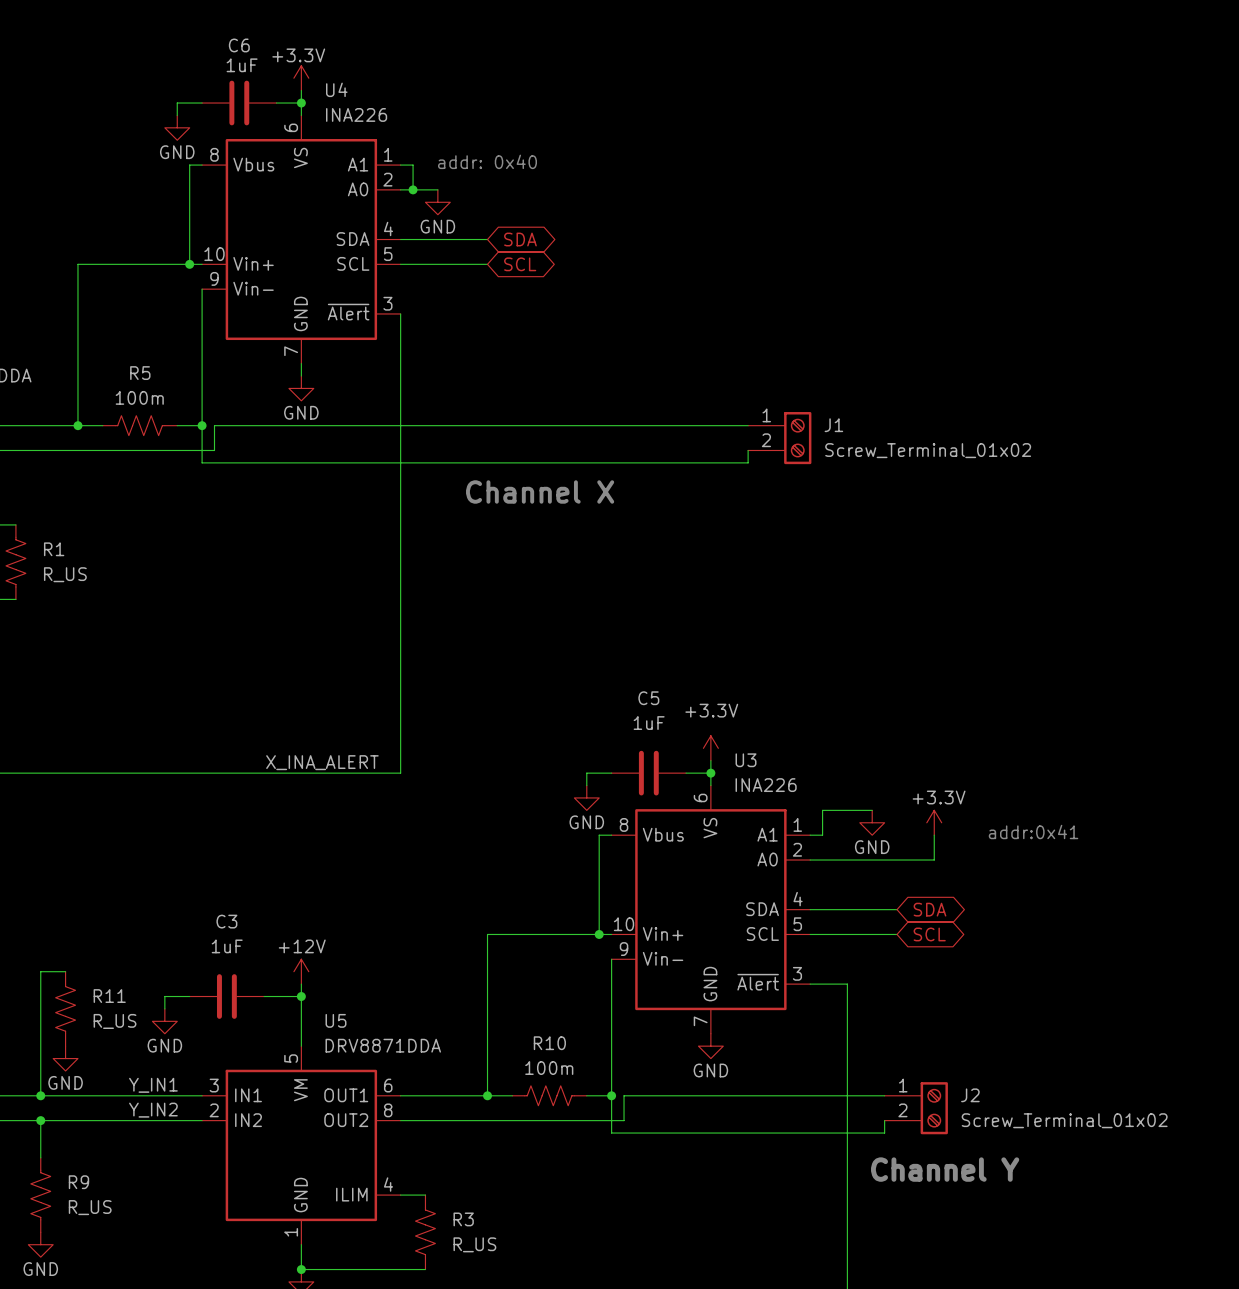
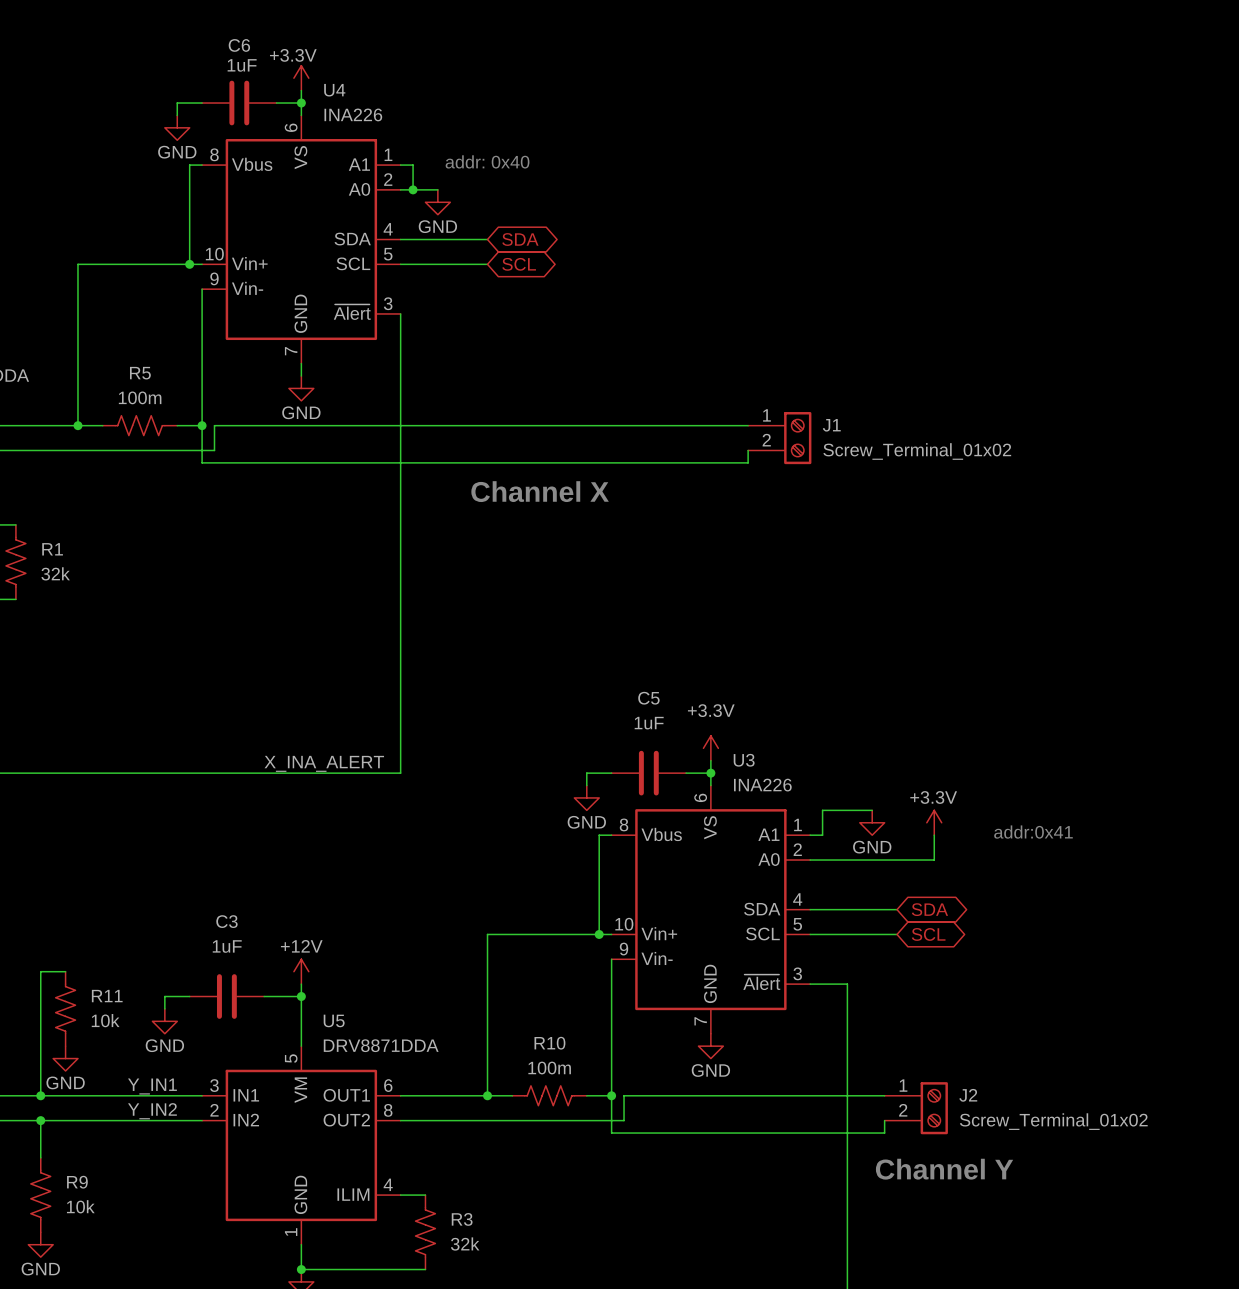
R1 value: R_US (65, 574) -> 32k (55, 573)
R11 value: R_US (115, 1021) -> 10k (105, 1020)
R9 value: R_US (90, 1207) -> 10k (80, 1206)
R3 value: R_US (474, 1244) -> 32k (465, 1244)

